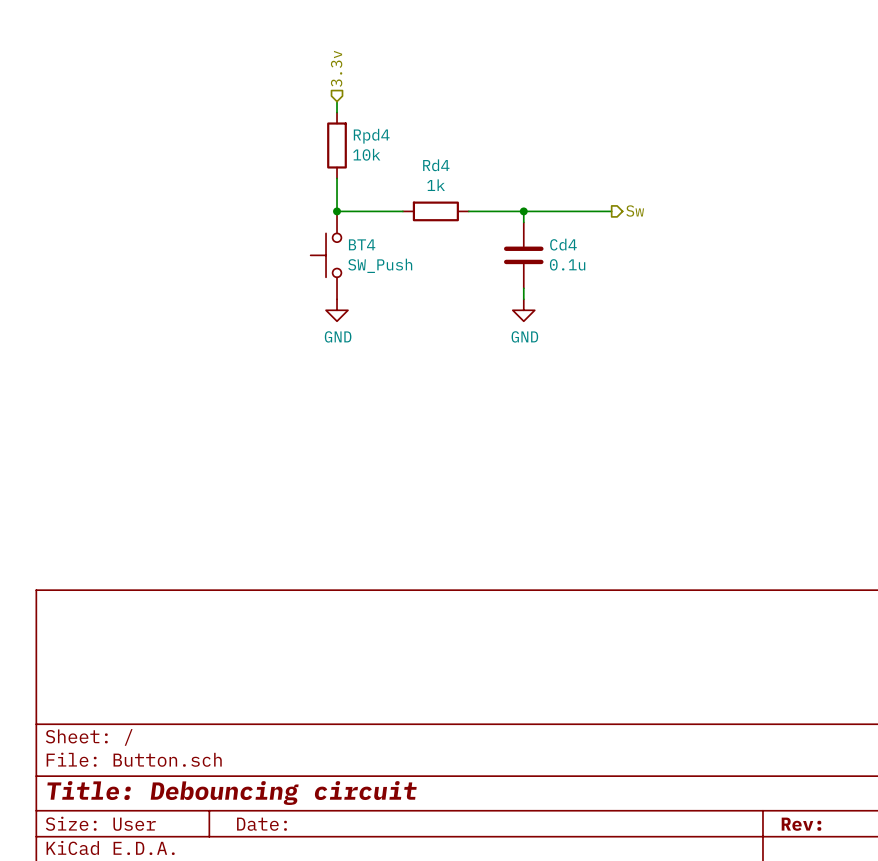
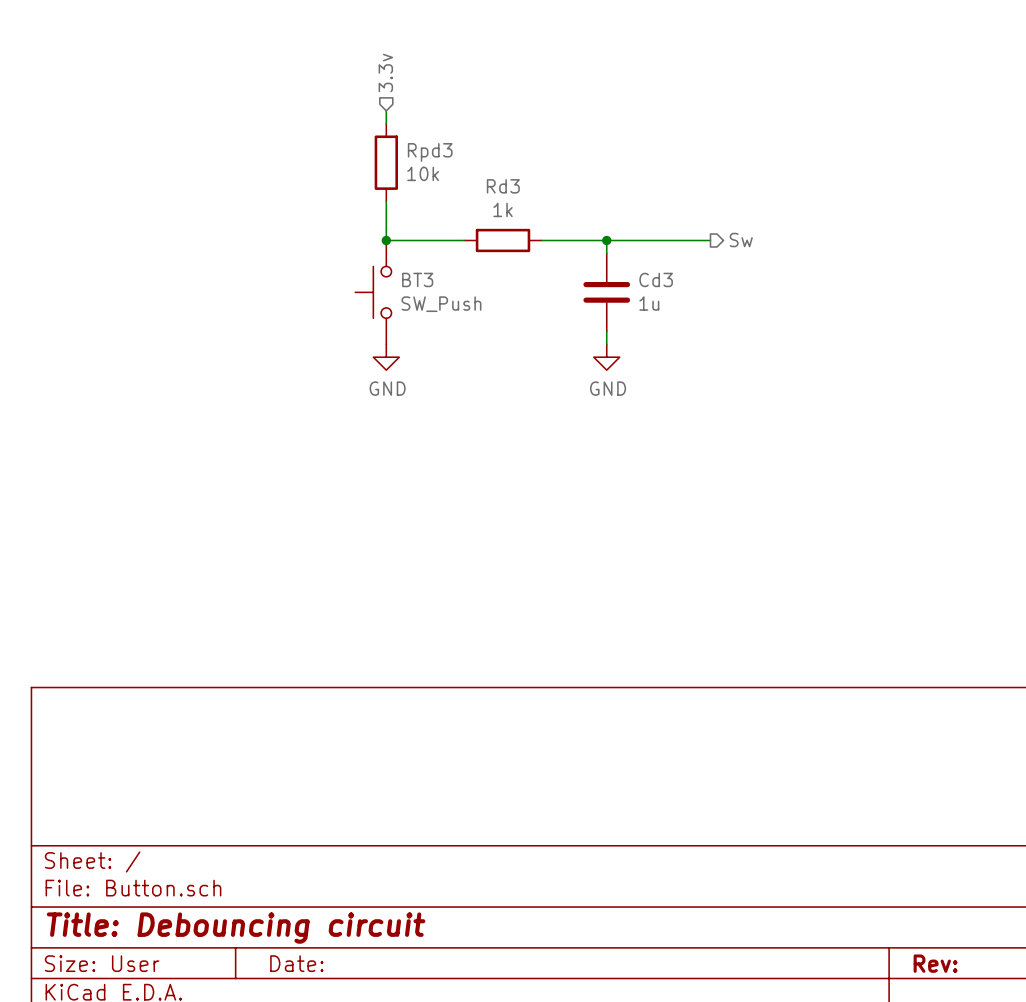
Rpd4 name: Rpd4 (371, 136) -> Rpd3 (430, 152)
Rd4 name: Rd4 (436, 165) -> Rd3 (503, 186)
BT4 name: BT4 (362, 244) -> BT3 (417, 279)
Cd4 name: Cd4 (563, 244) -> Cd3 (656, 279)
Cd4 value: 0.1u (567, 264) -> 1u (649, 303)

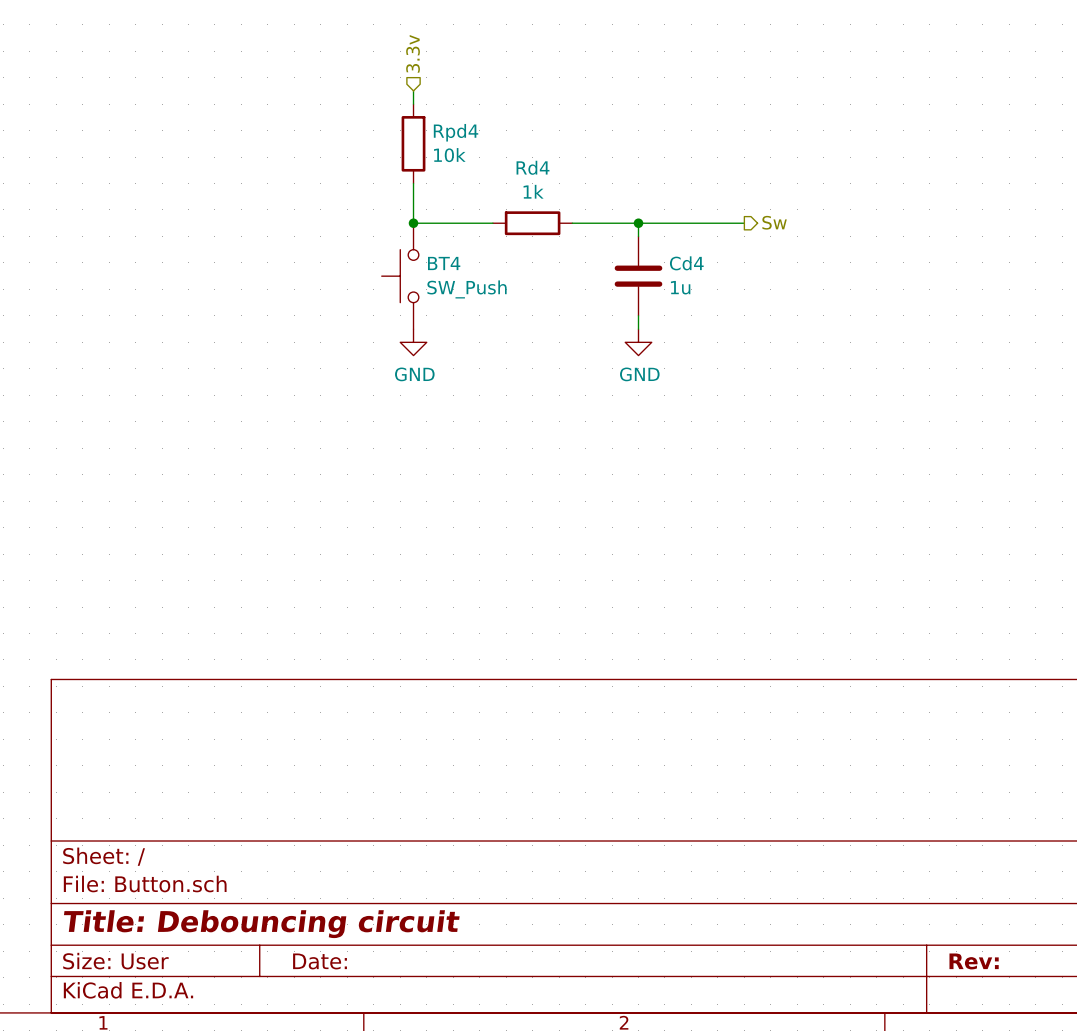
Rpd3 name: Rpd3 (430, 152) -> Rpd4 (456, 132)
Rd3 name: Rd3 (503, 186) -> Rd4 (533, 167)
BT3 name: BT3 (417, 279) -> BT4 (444, 263)
Cd3 name: Cd3 (656, 279) -> Cd4 (686, 263)

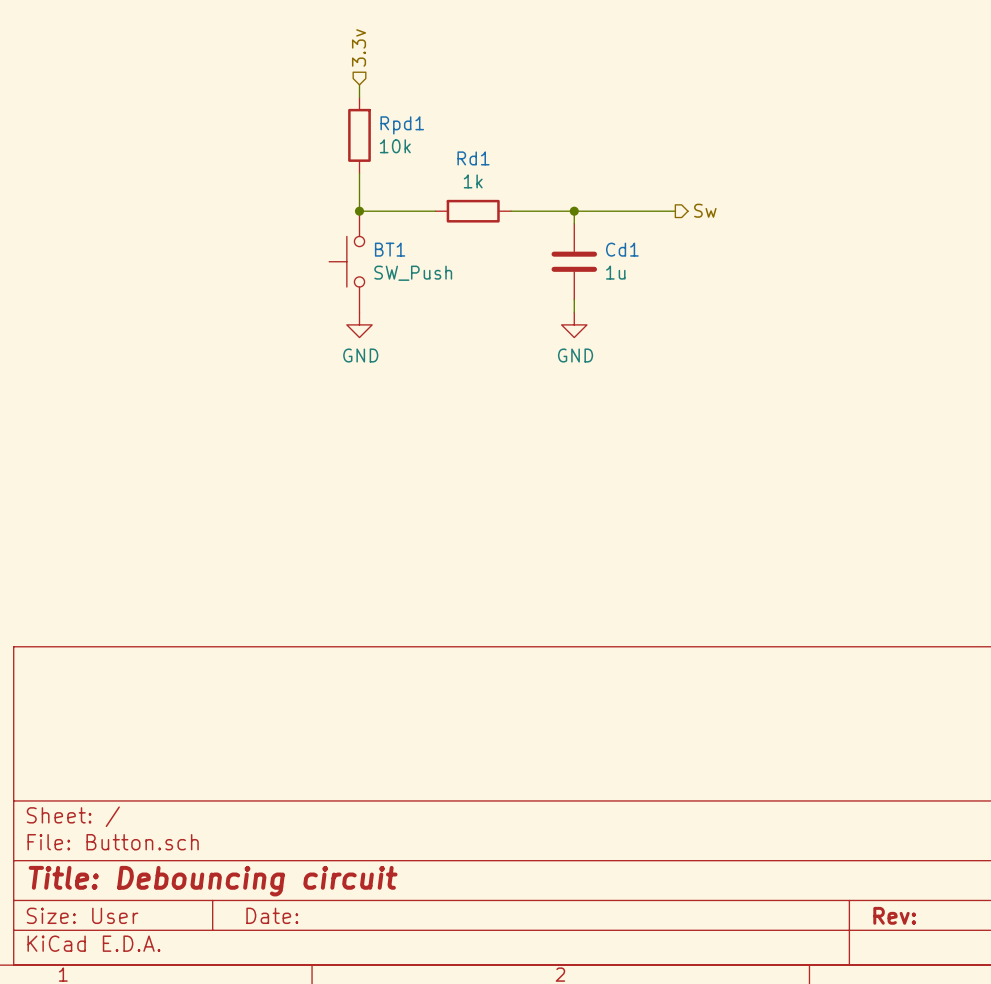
Rpd4 name: Rpd4 (456, 132) -> Rpd1 (402, 125)
Rd4 name: Rd4 (533, 167) -> Rd1 (473, 158)
BT4 name: BT4 (444, 263) -> BT1 (390, 249)
Cd4 name: Cd4 (686, 263) -> Cd1 (622, 249)

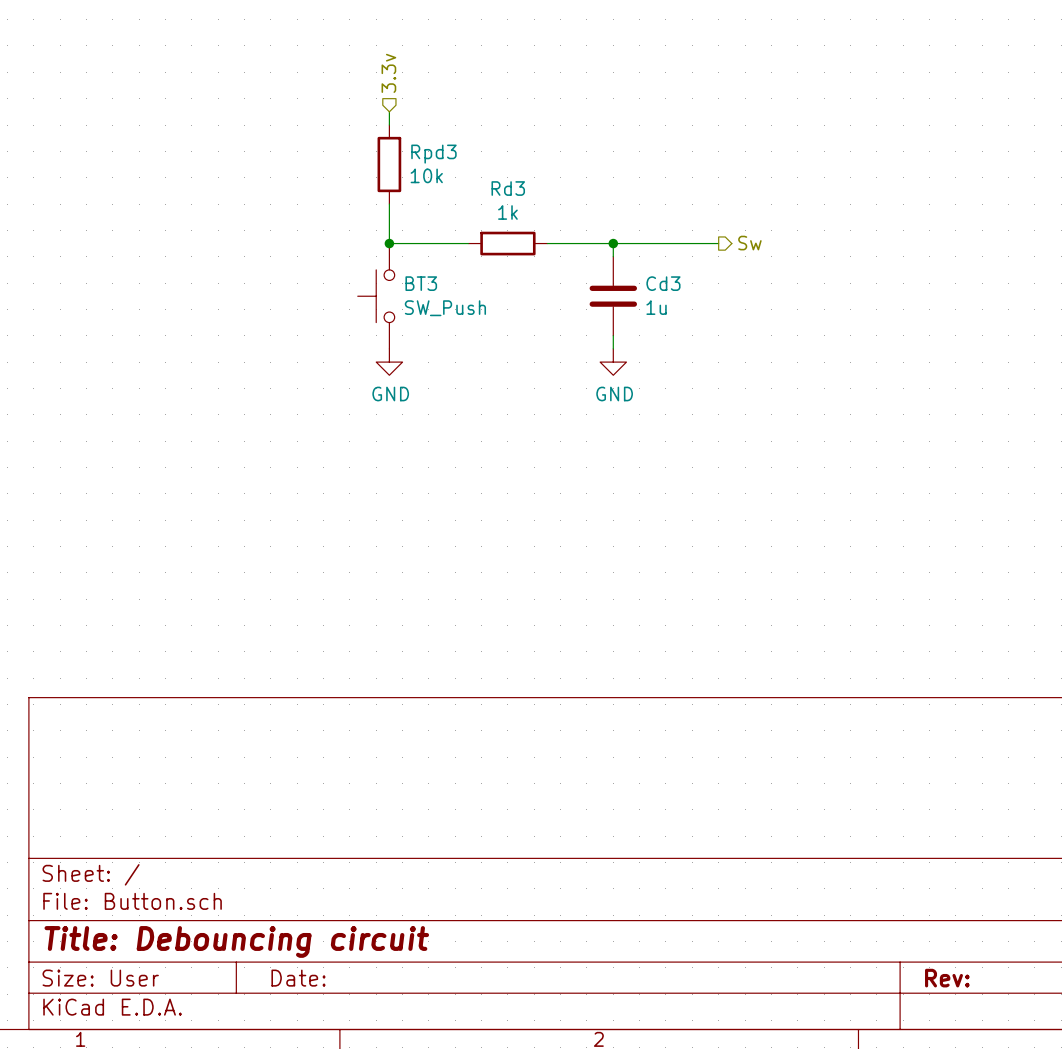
Rpd1 name: Rpd1 (402, 125) -> Rpd3 (433, 154)
Rd1 name: Rd1 (473, 158) -> Rd3 (508, 188)
BT1 name: BT1 (390, 249) -> BT3 (421, 283)
Cd1 name: Cd1 (622, 249) -> Cd3 (663, 283)

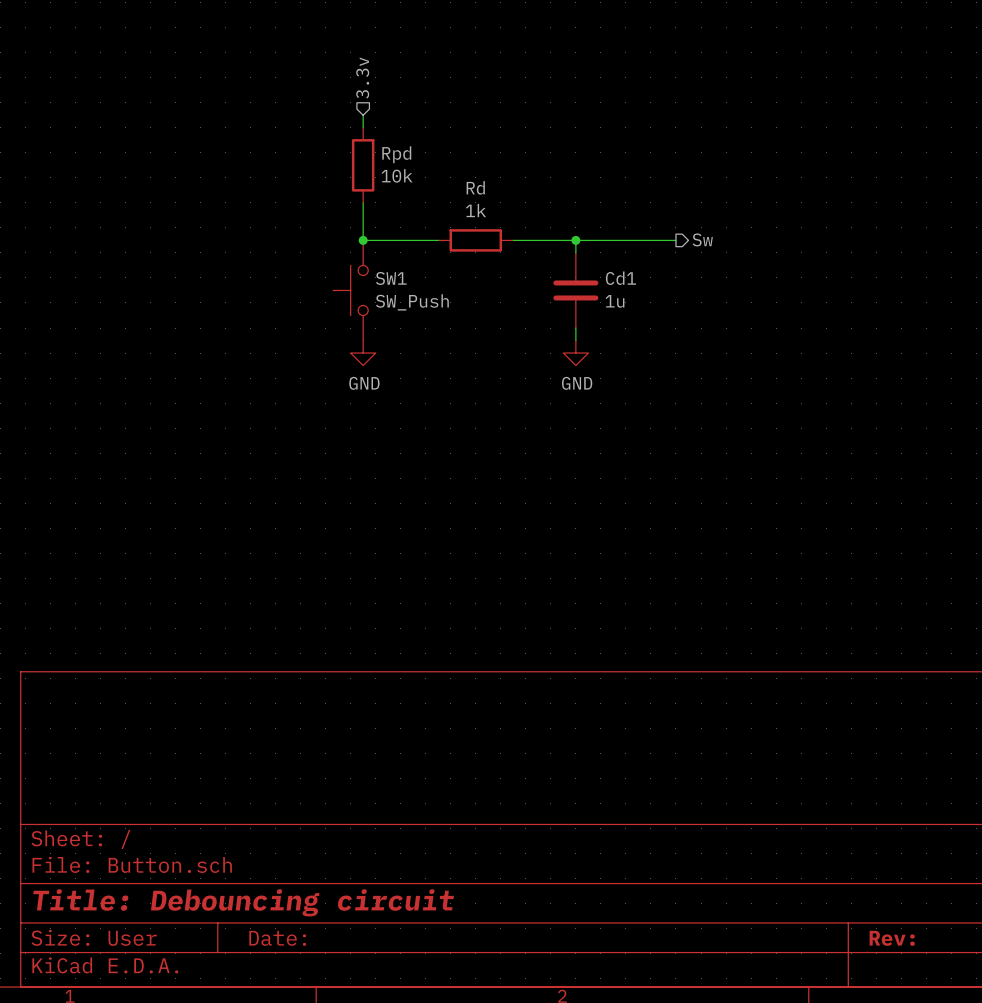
Rpd3 name: Rpd3 (433, 154) -> Rpd (396, 154)
Rd3 name: Rd3 (508, 188) -> Rd (475, 187)
BT3 name: BT3 (421, 283) -> SW1 (391, 278)
Cd3 name: Cd3 (663, 283) -> Cd1 (620, 278)

